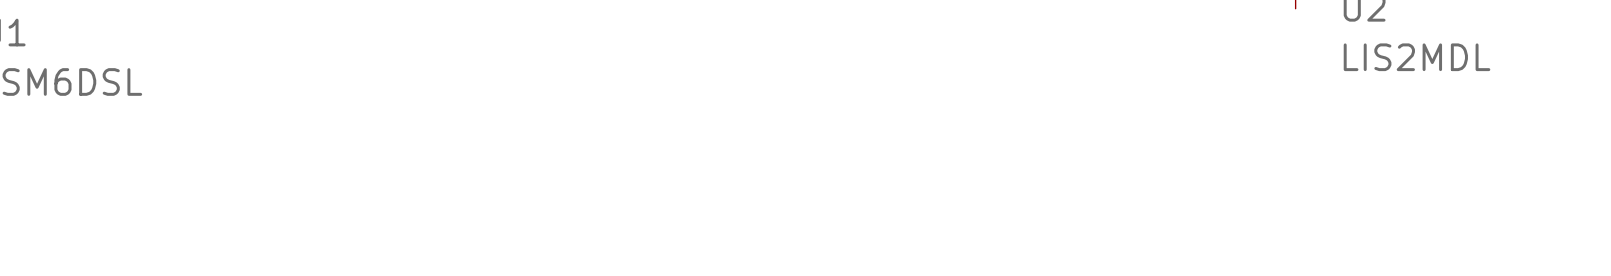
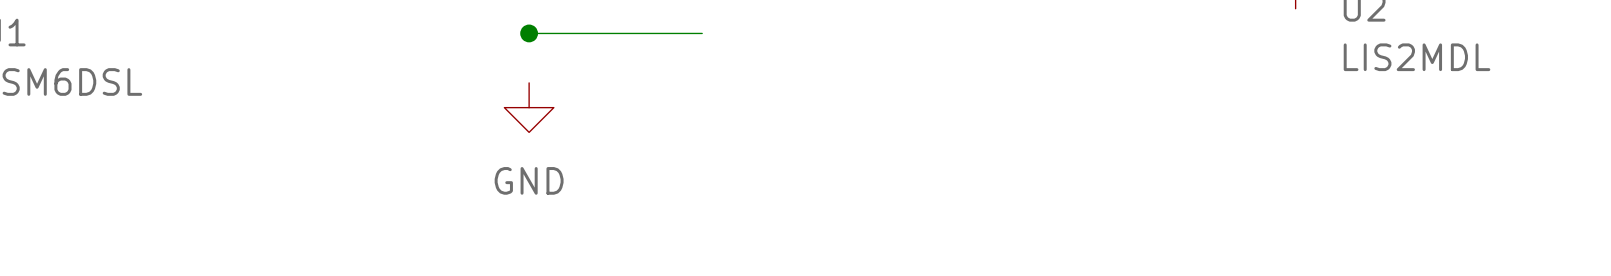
wire: none -> (529, 33) (702, 33)
junction: none -> (529, 33)
power symbol: none -> GND (529, 107)

